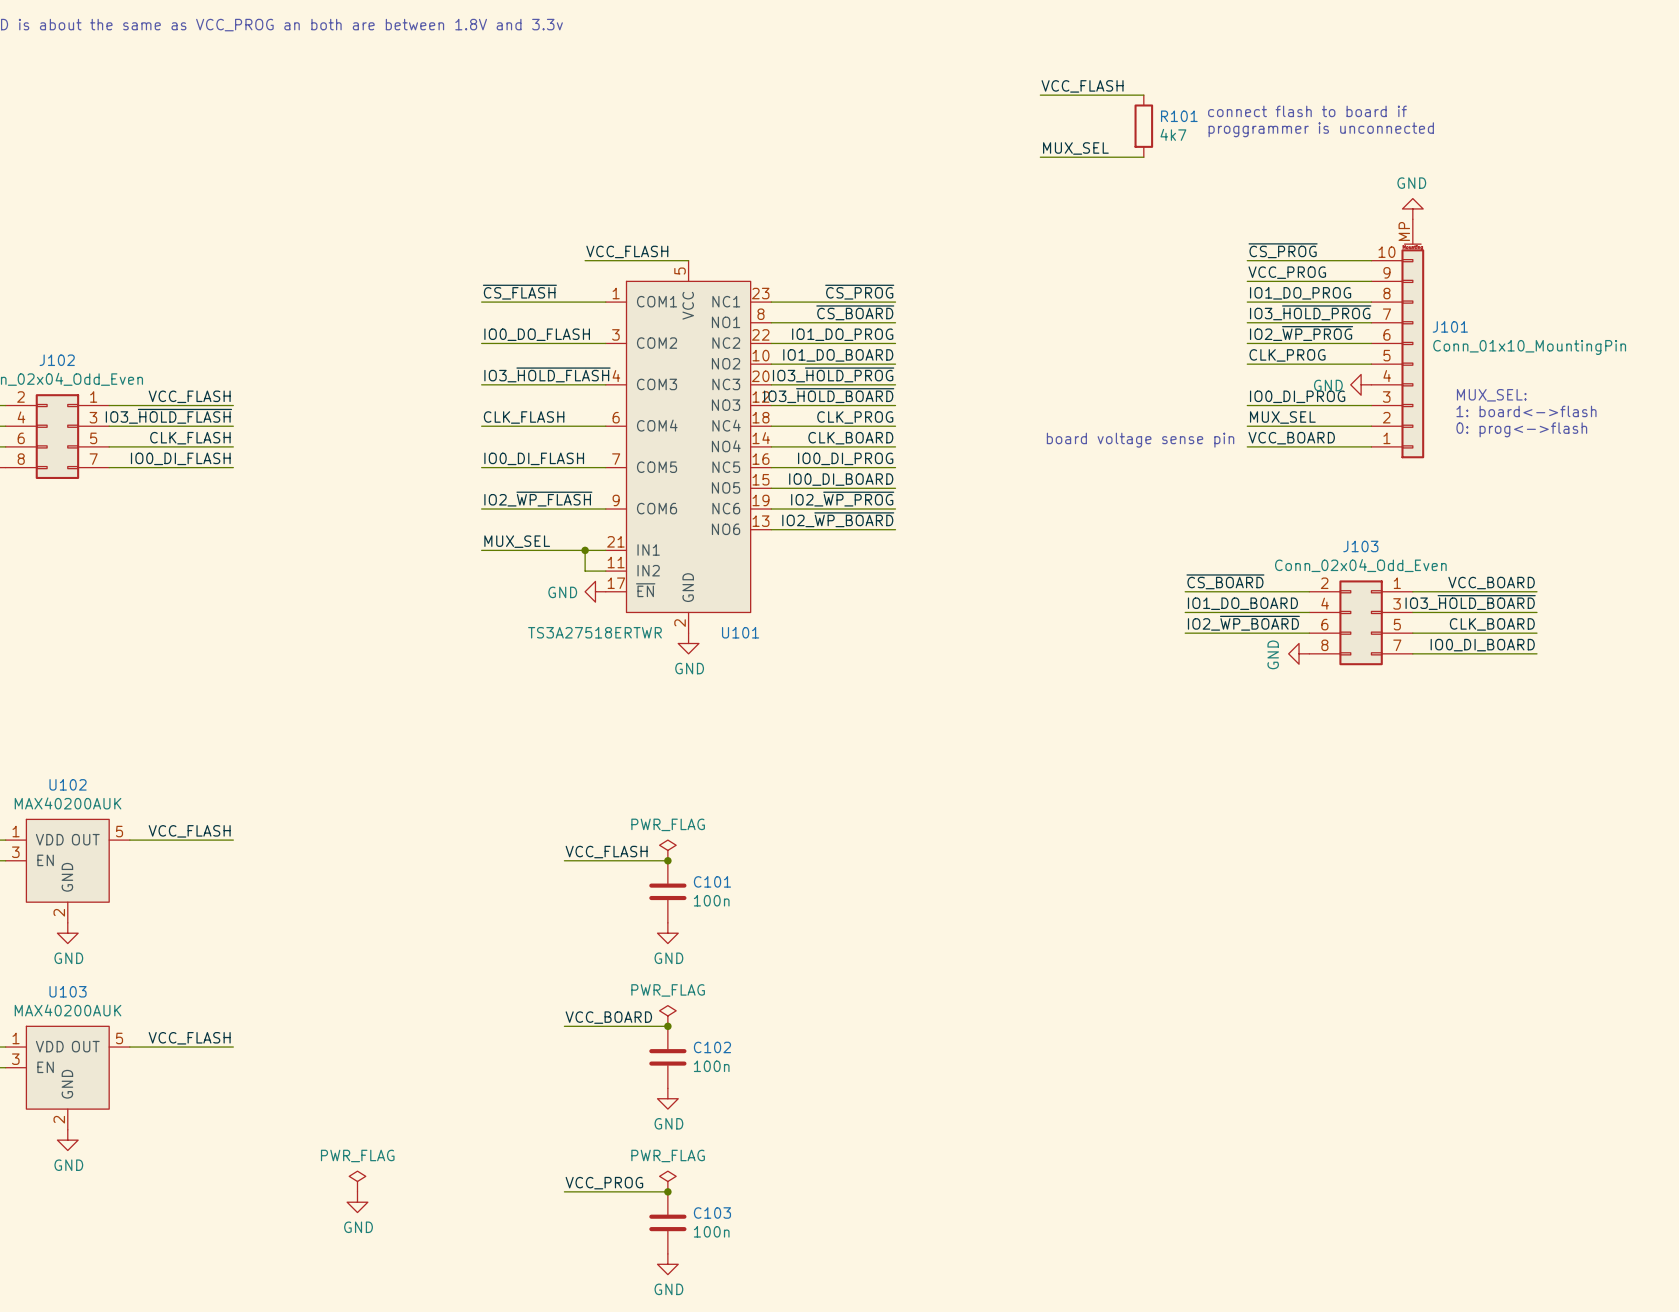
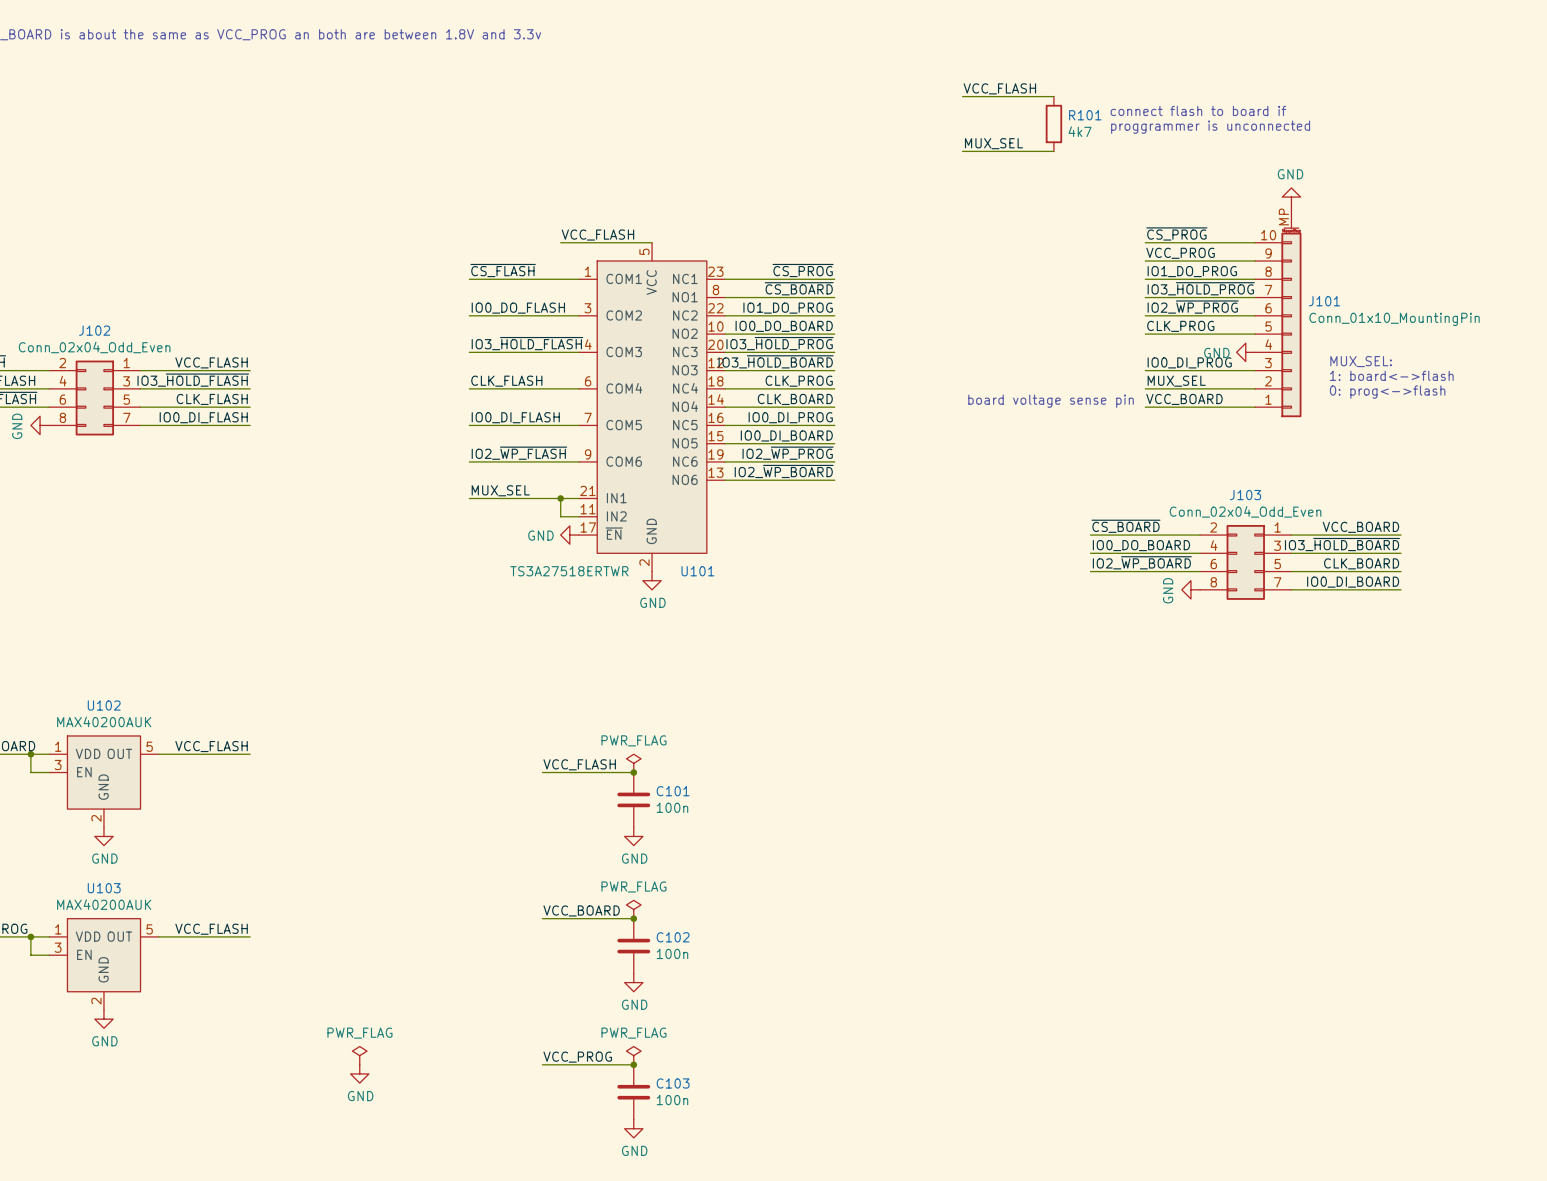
label: IO1_DO_BOARD (838, 355) -> IO0_DO_BOARD (784, 326)
label: IO1_DO_BOARD (1242, 603) -> IO0_DO_BOARD (1141, 545)

